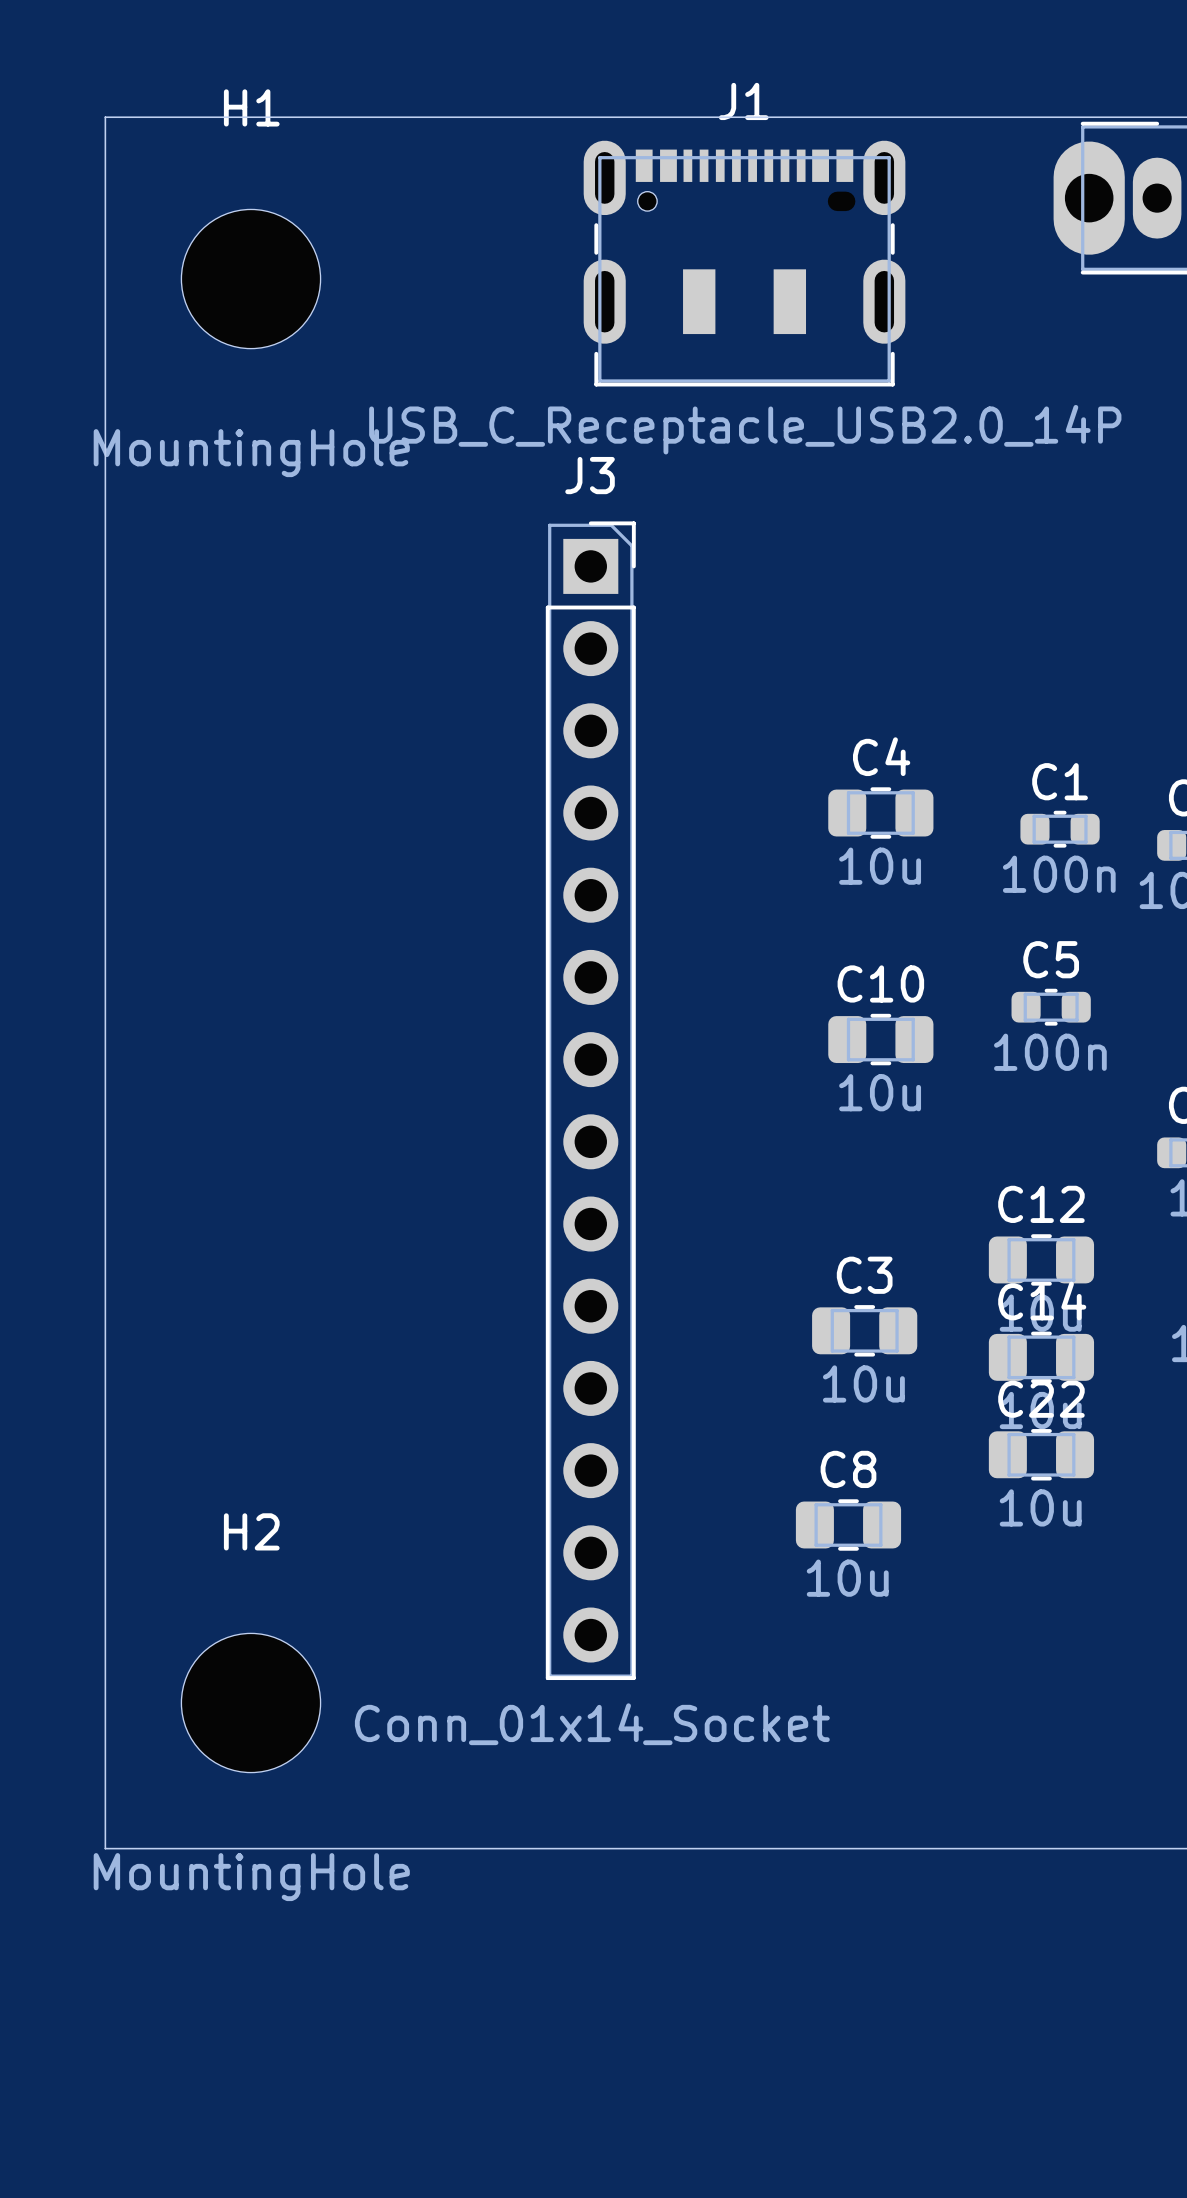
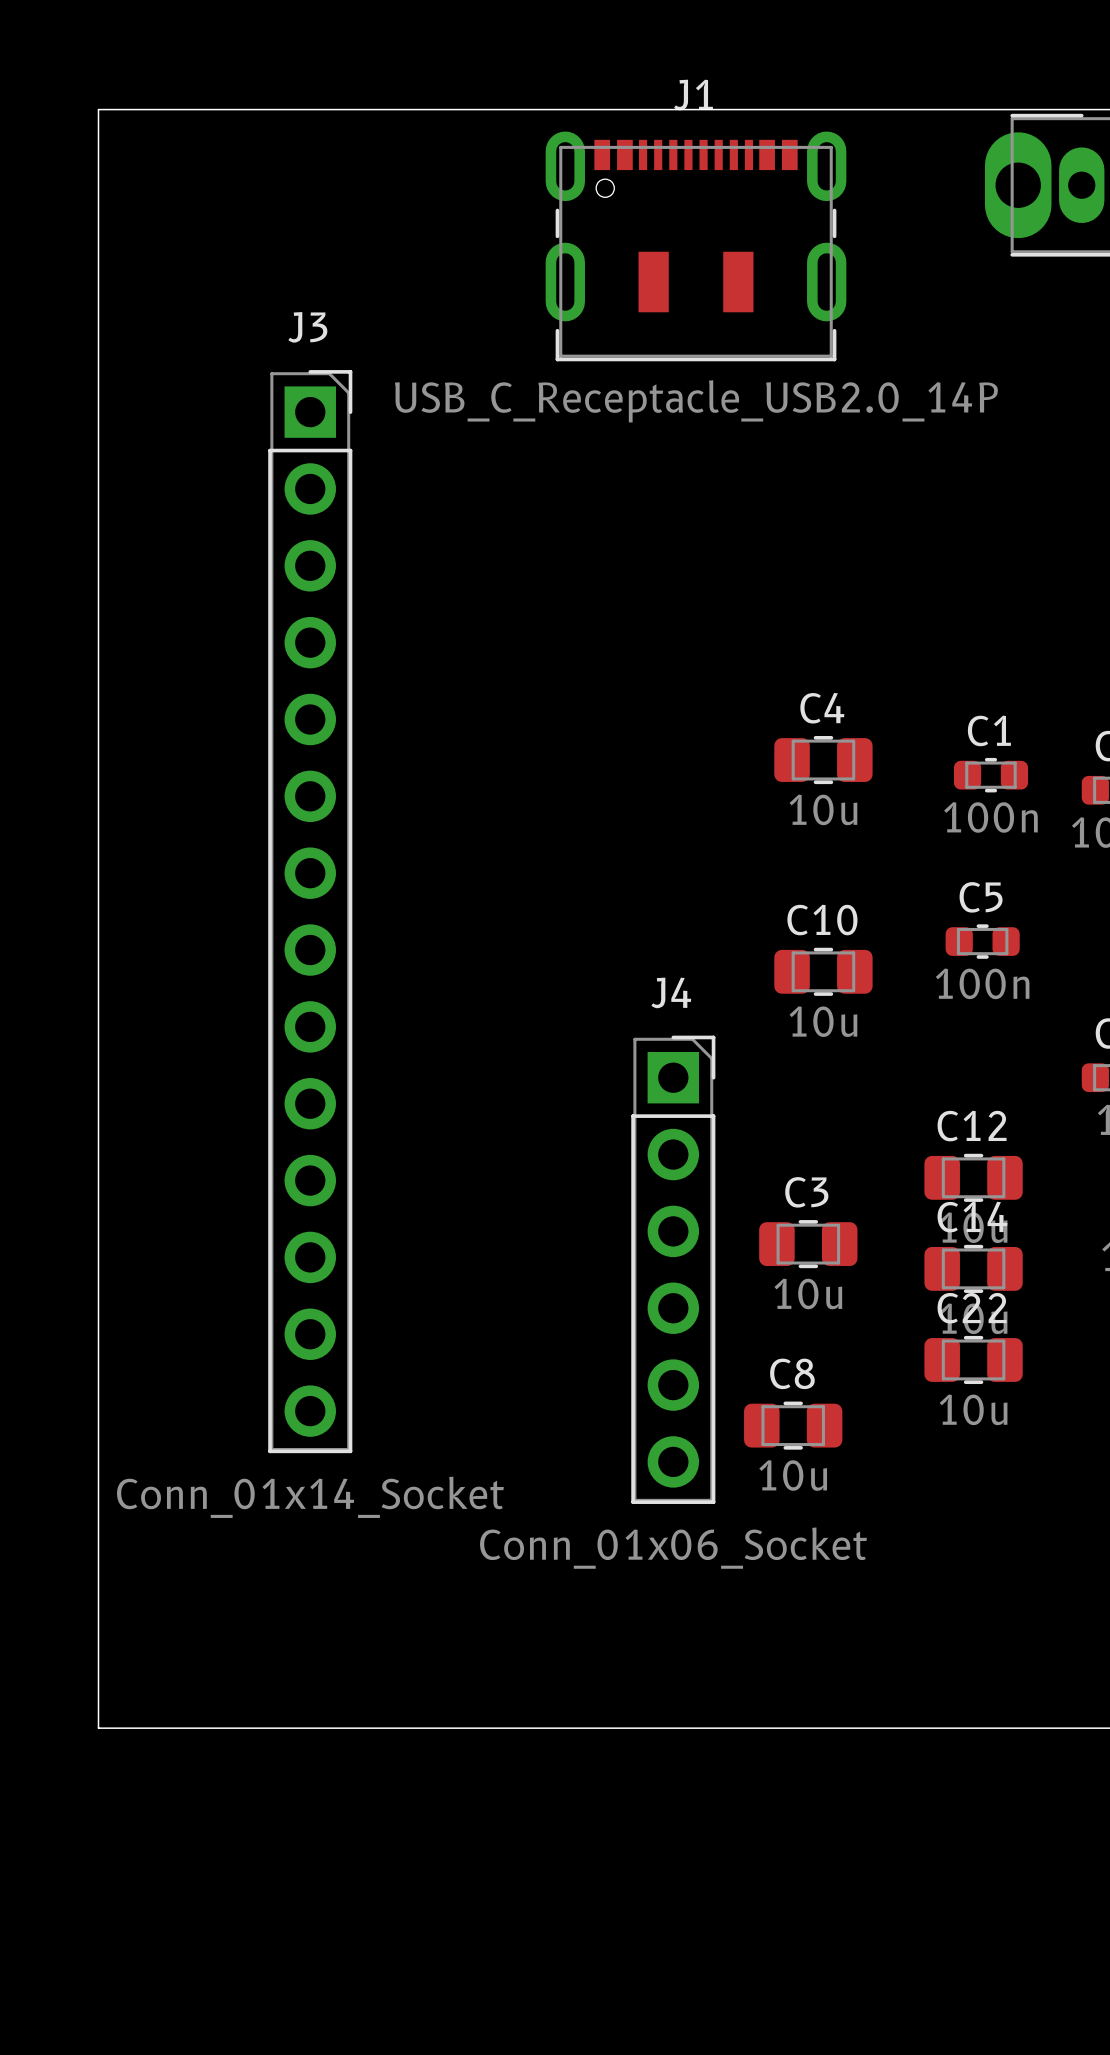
H1: MountingHole (250, 279) -> none
J3 position: (590, 1100) -> (310, 911)
J4: none -> Conn_01x06_Socket (673, 1269)
H2: MountingHole (250, 1702) -> none

